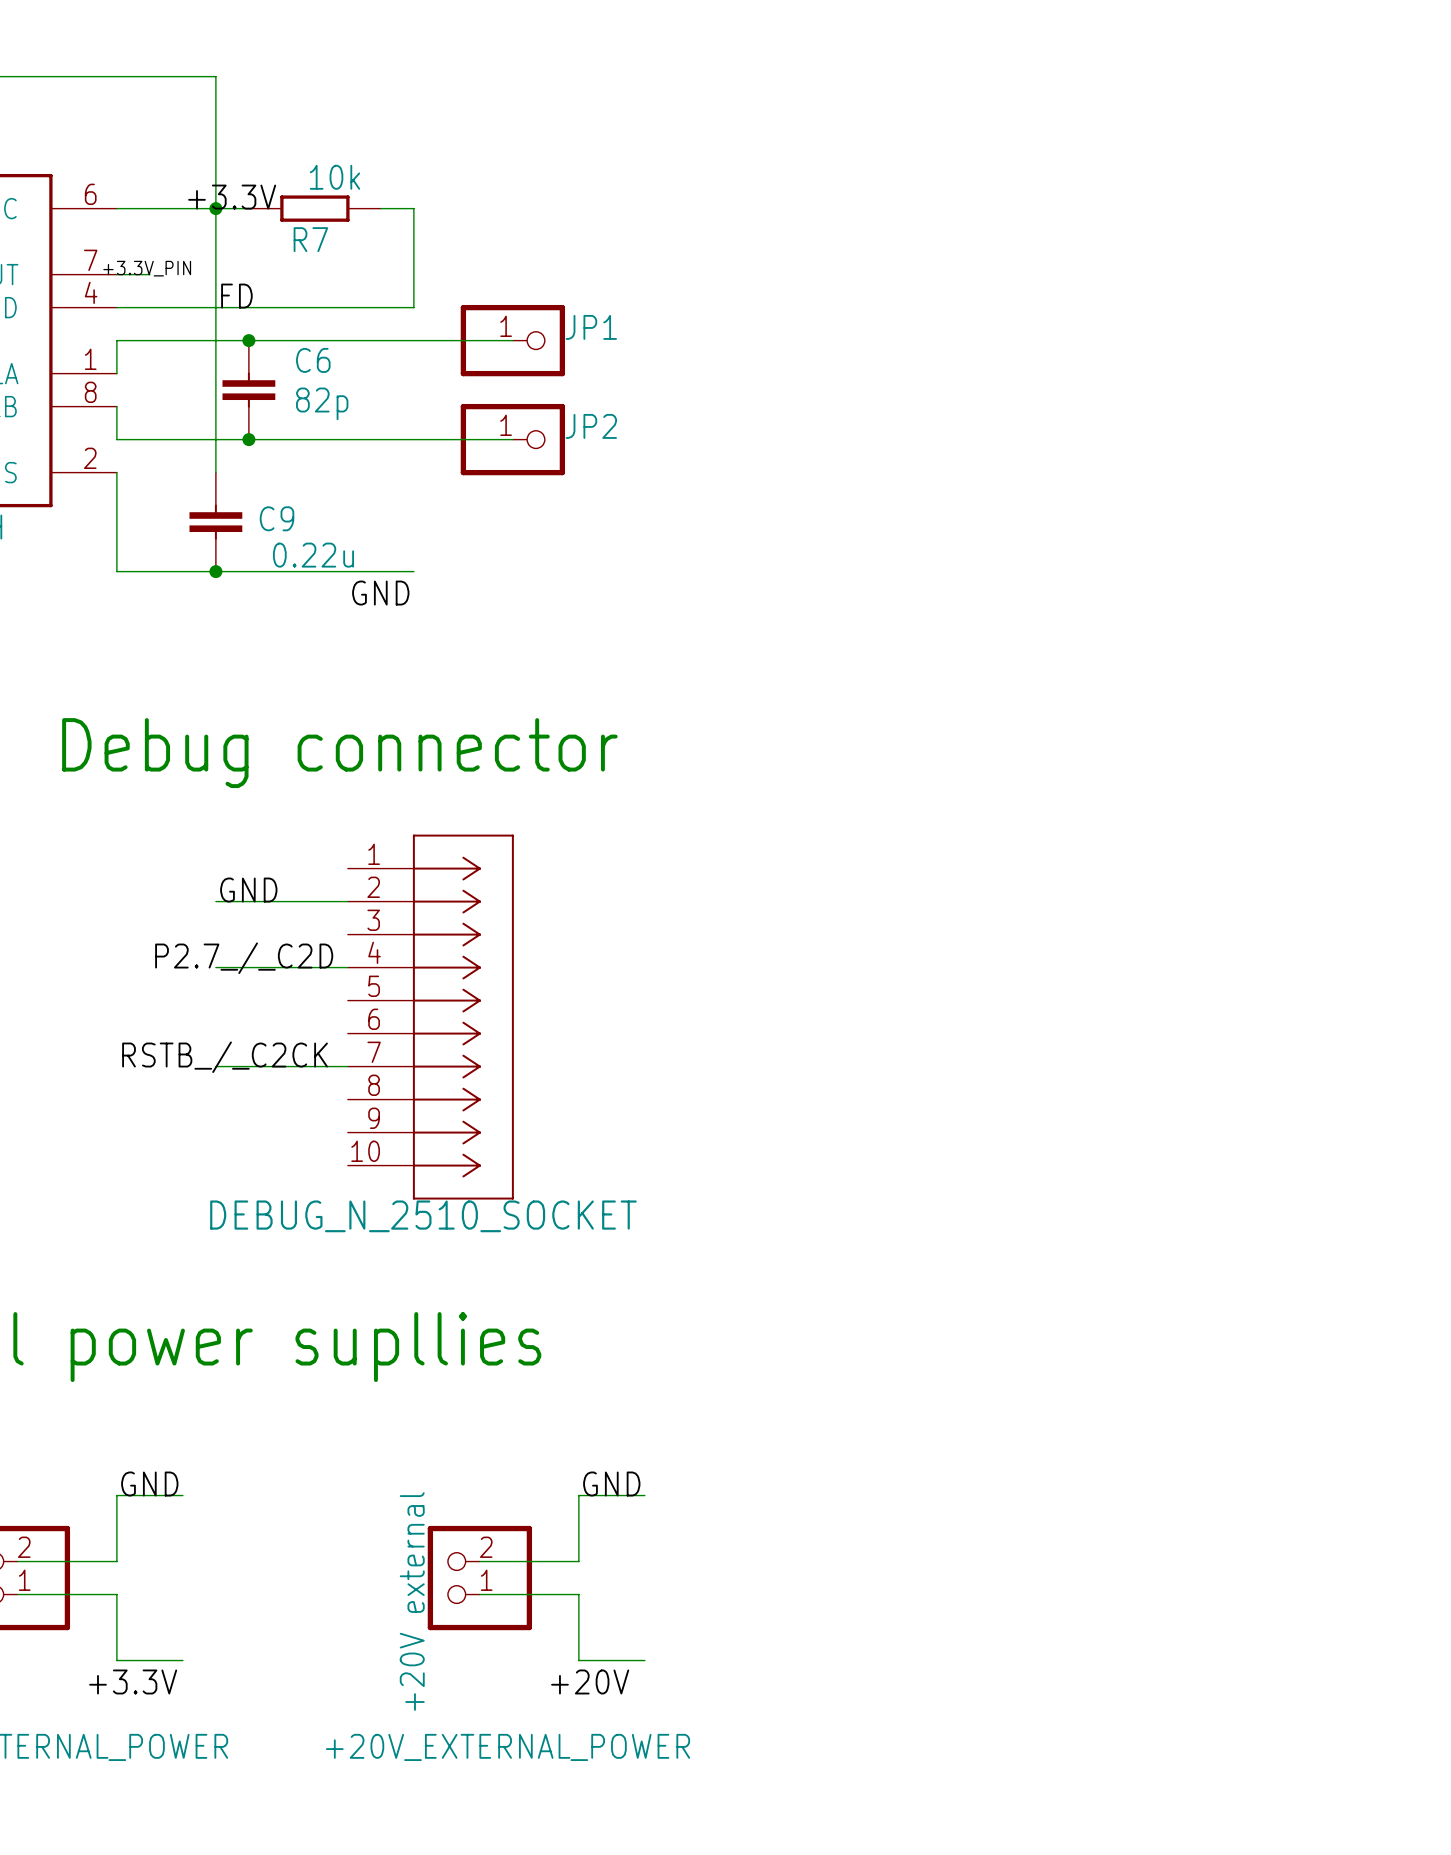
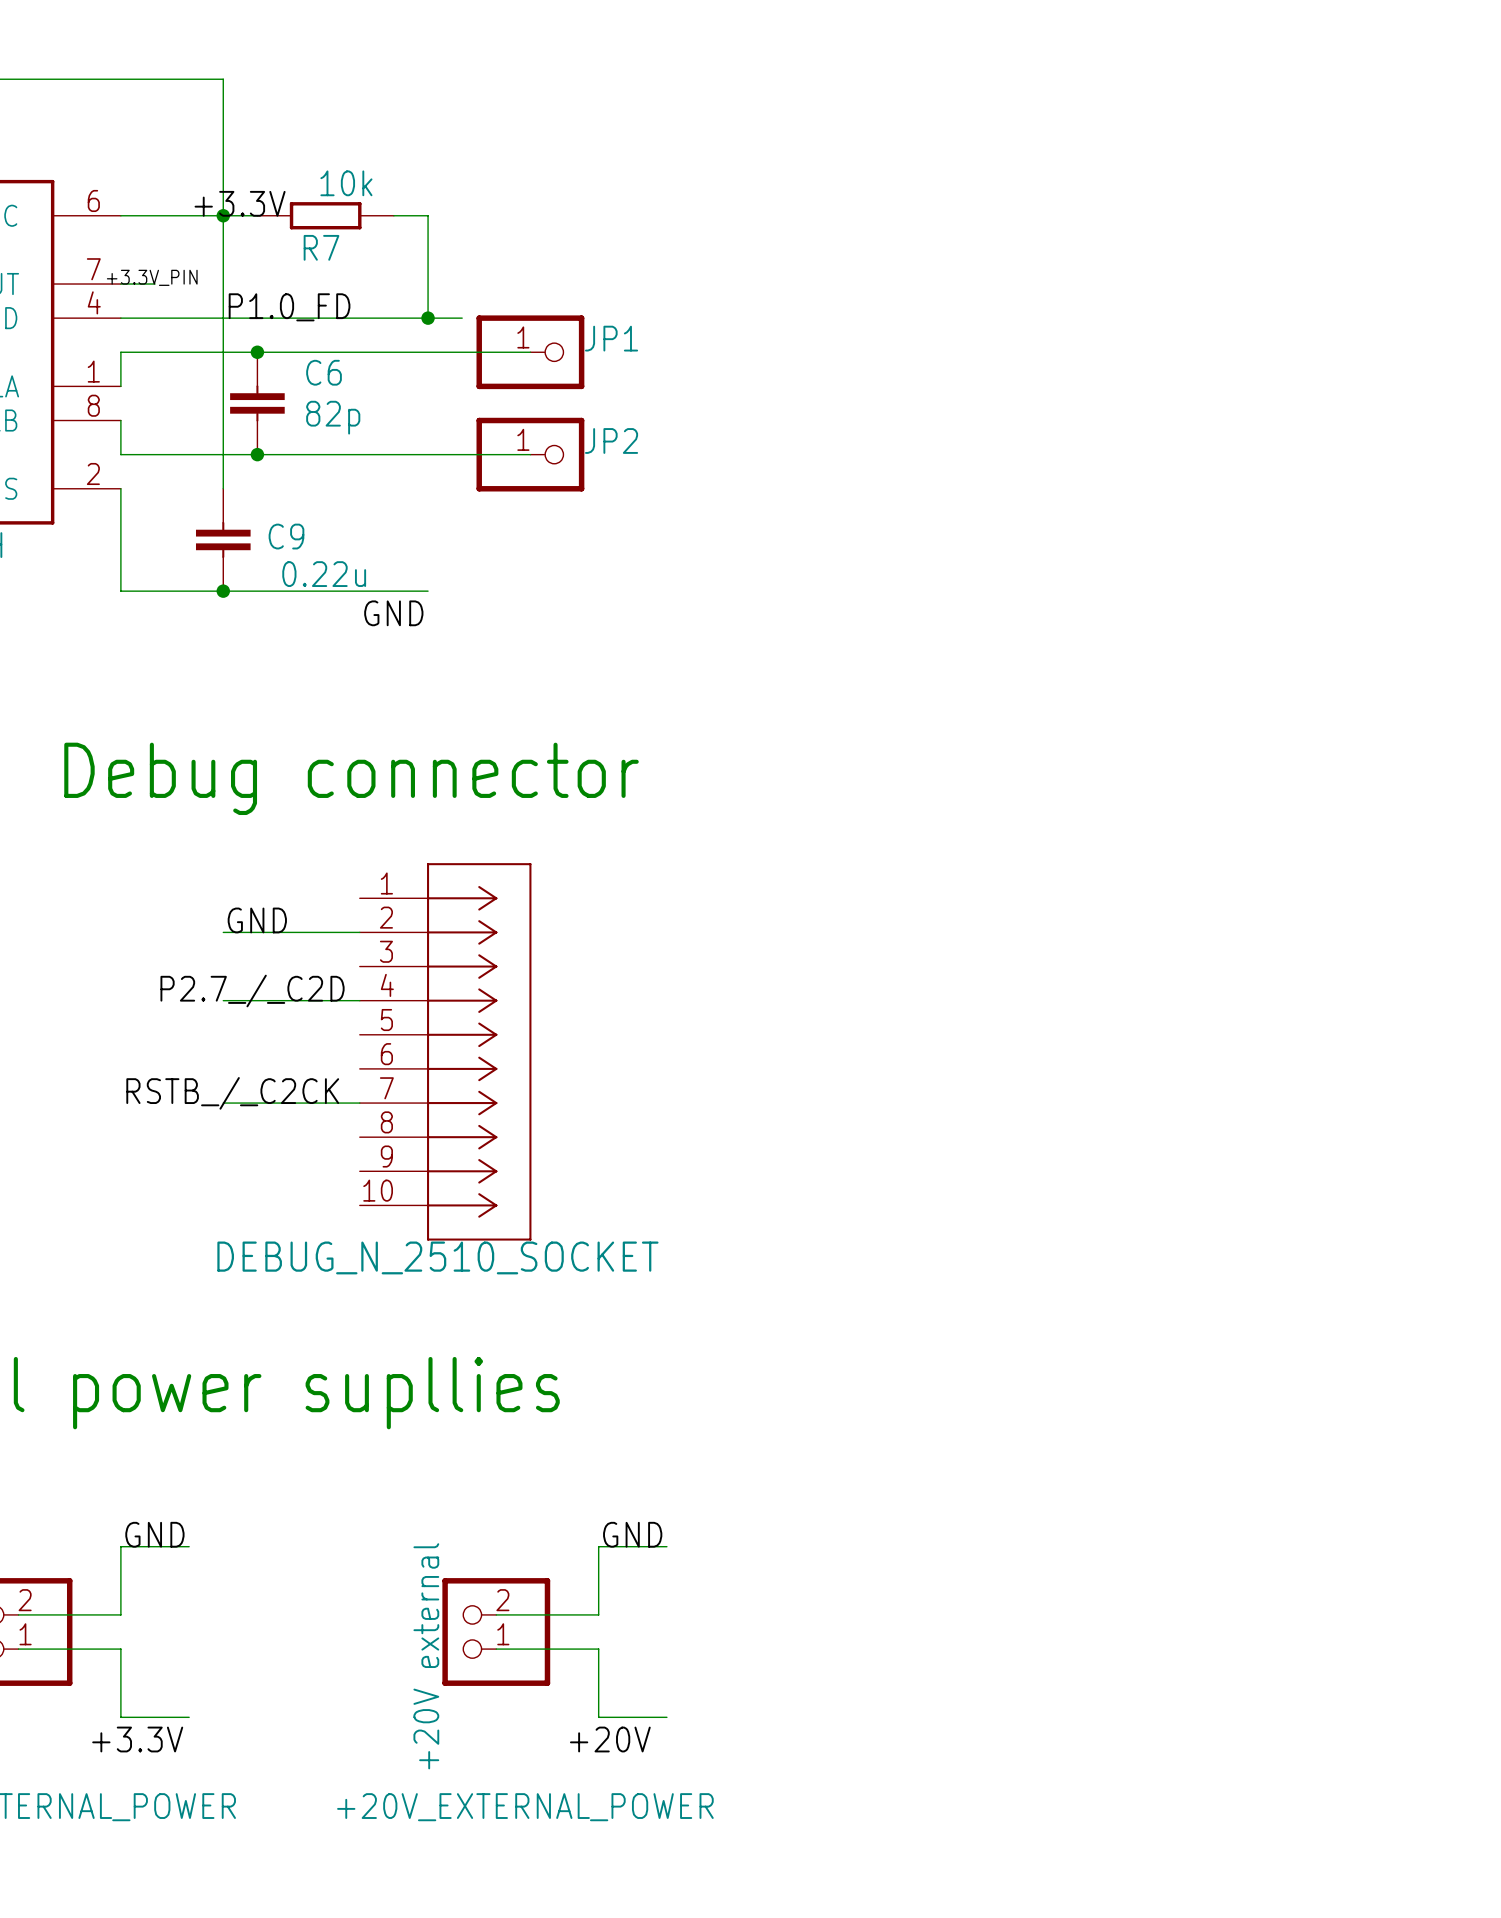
label: FD (236, 296) -> P1.0_FD (289, 307)
wire: none -> (428, 318) (462, 318)
junction: none -> (428, 318)

